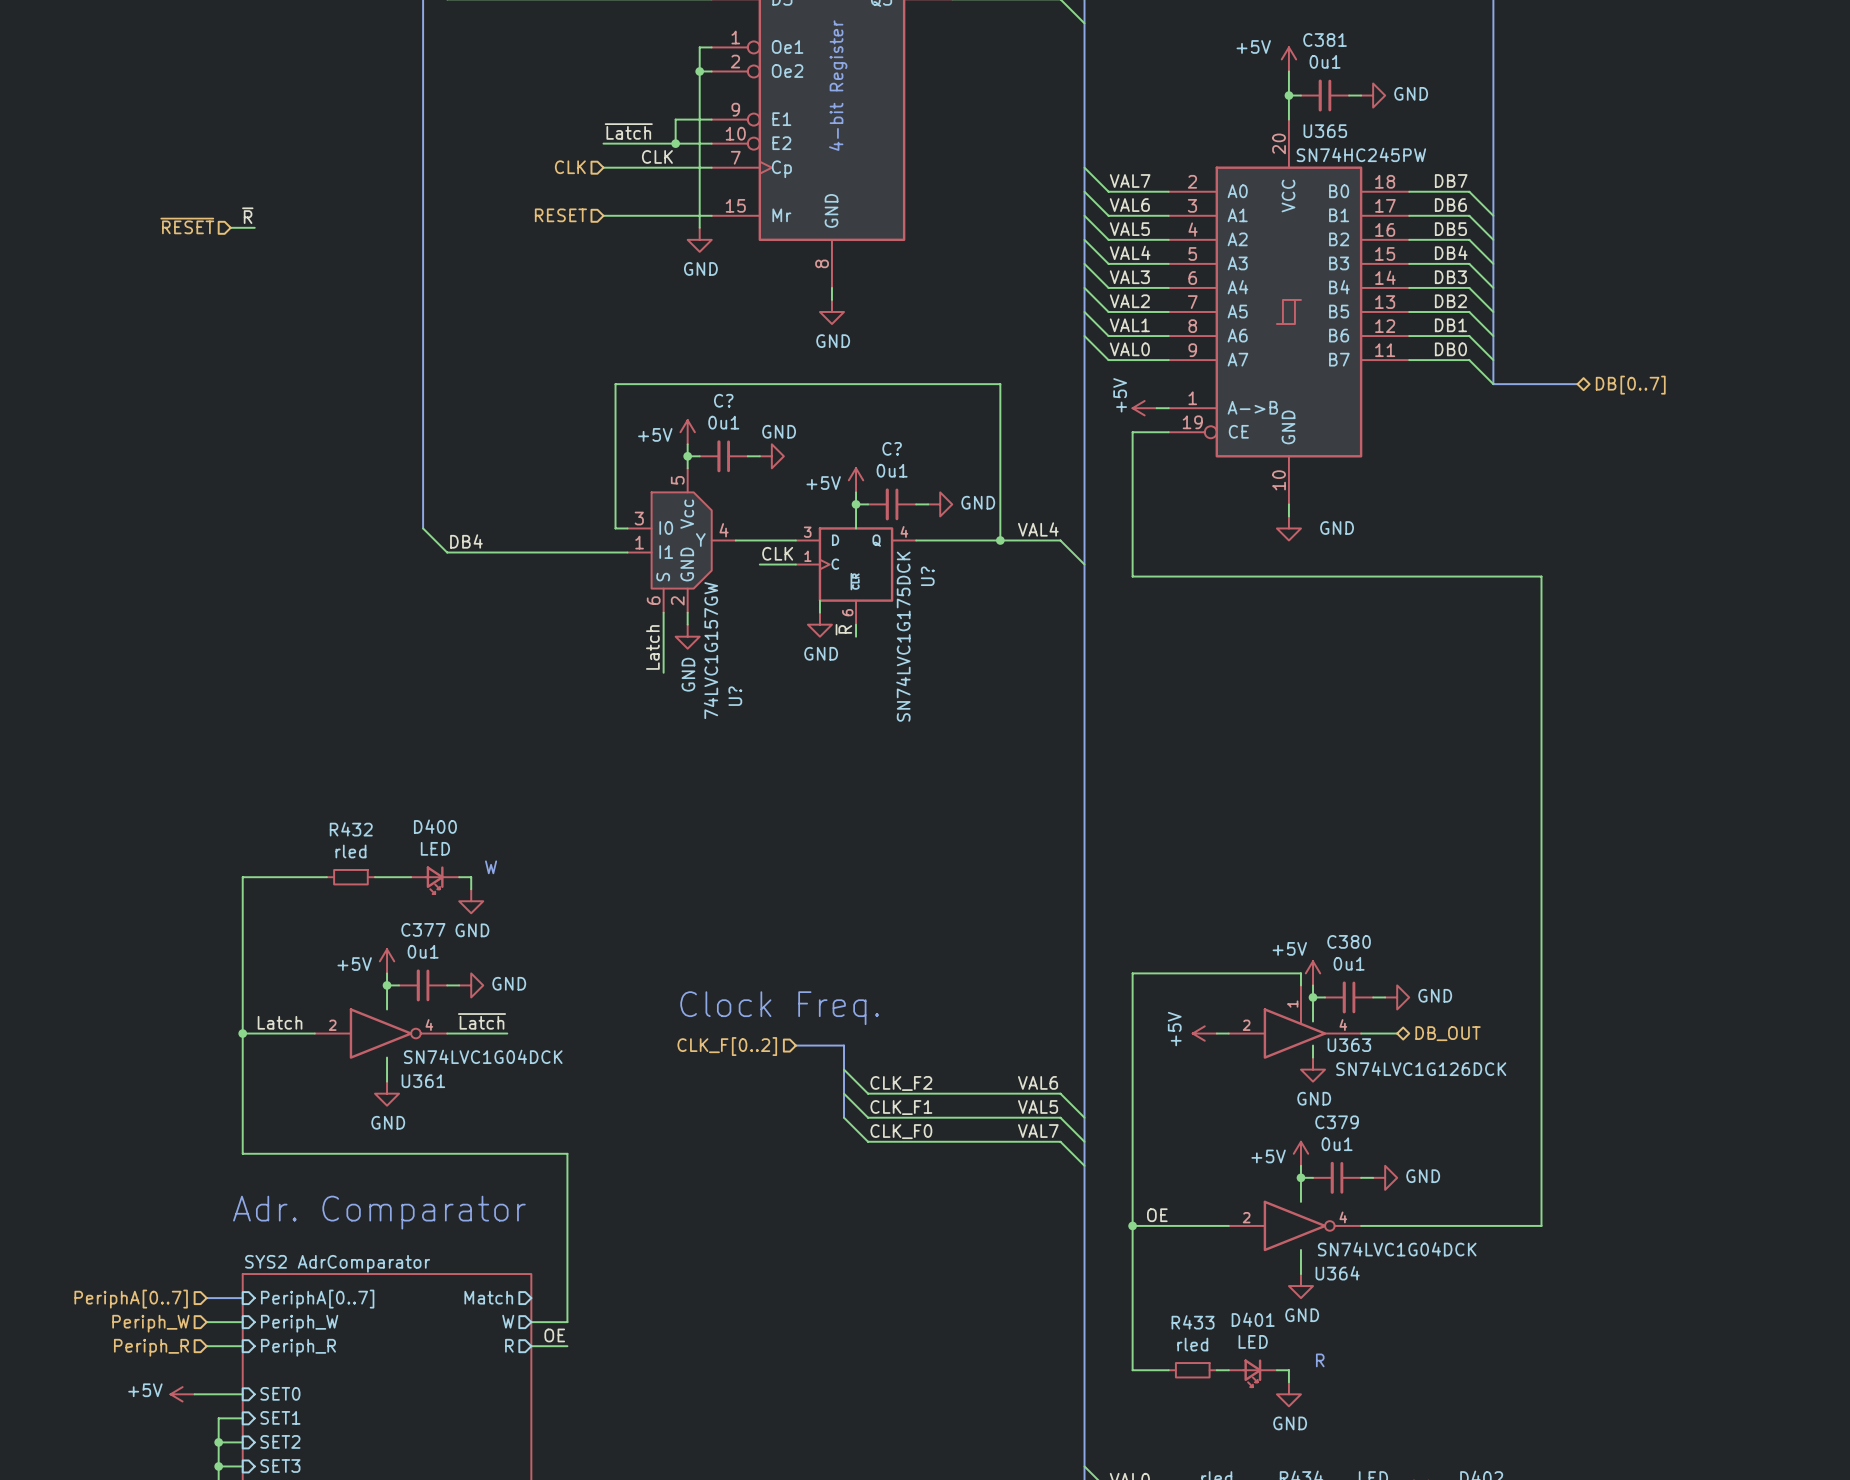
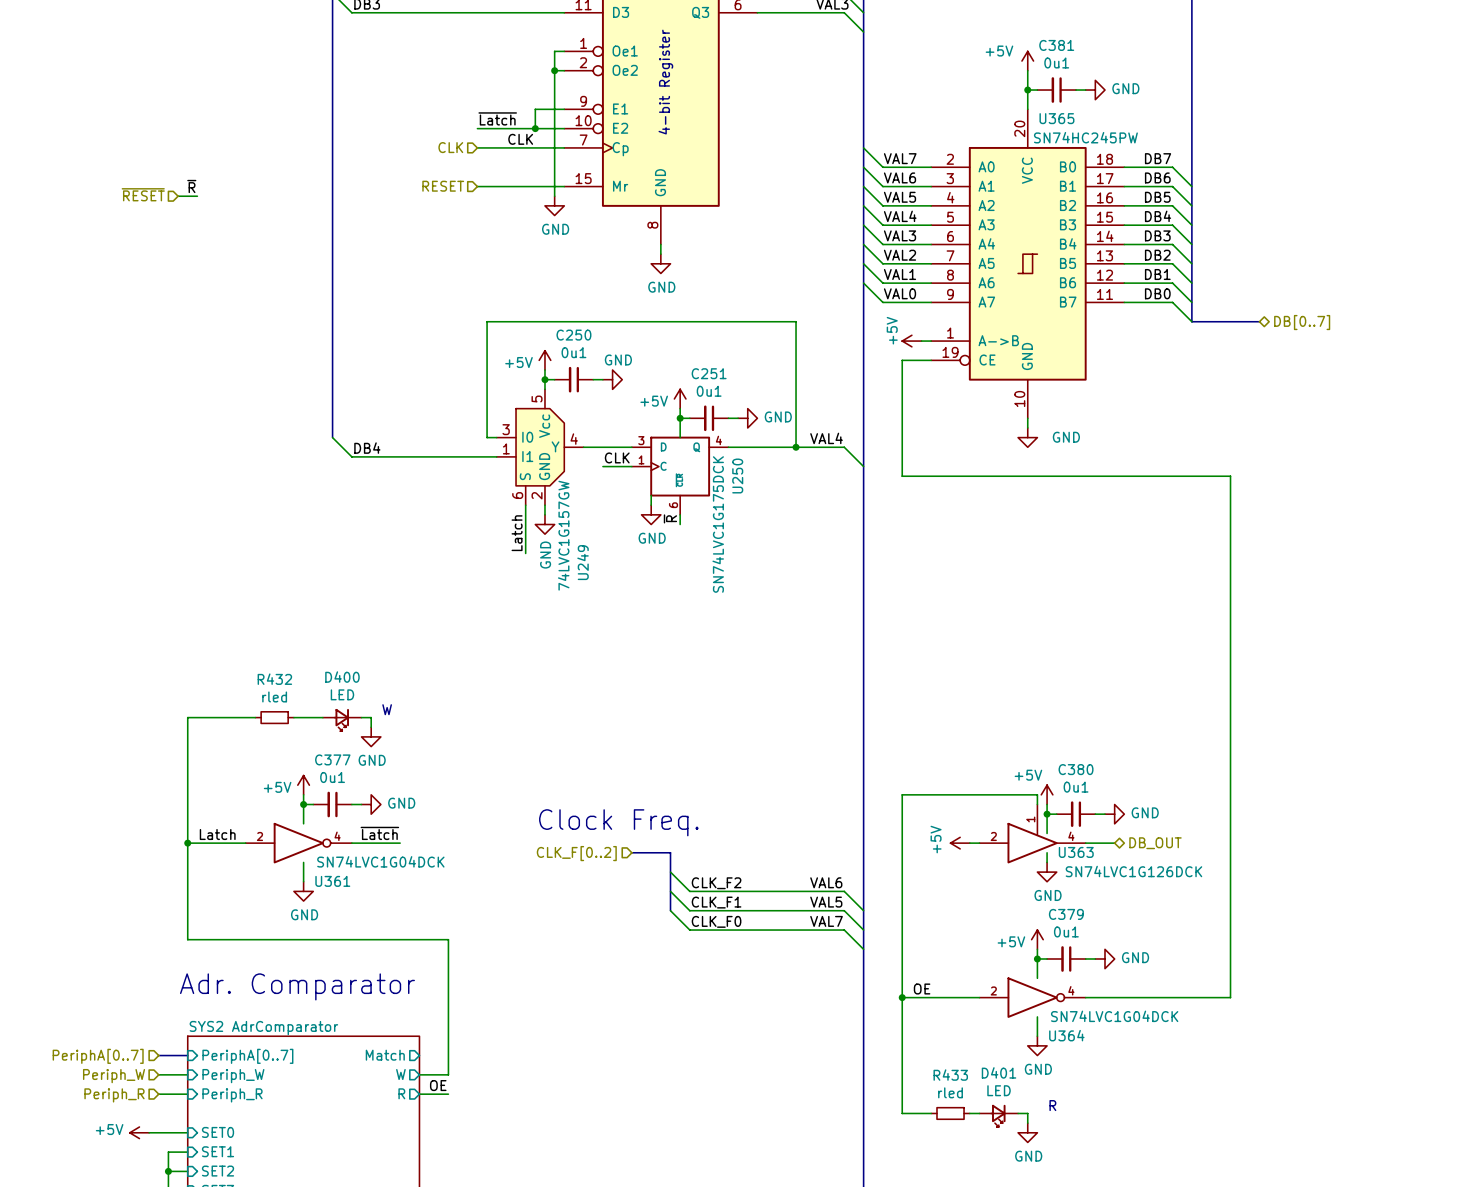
C? name: C? (723, 400) -> C250 (573, 335)
C? name: C? (892, 448) -> C251 (709, 373)
U? name: U? (927, 576) -> U250 (737, 476)
U? name: U? (735, 696) -> U249 (583, 562)

